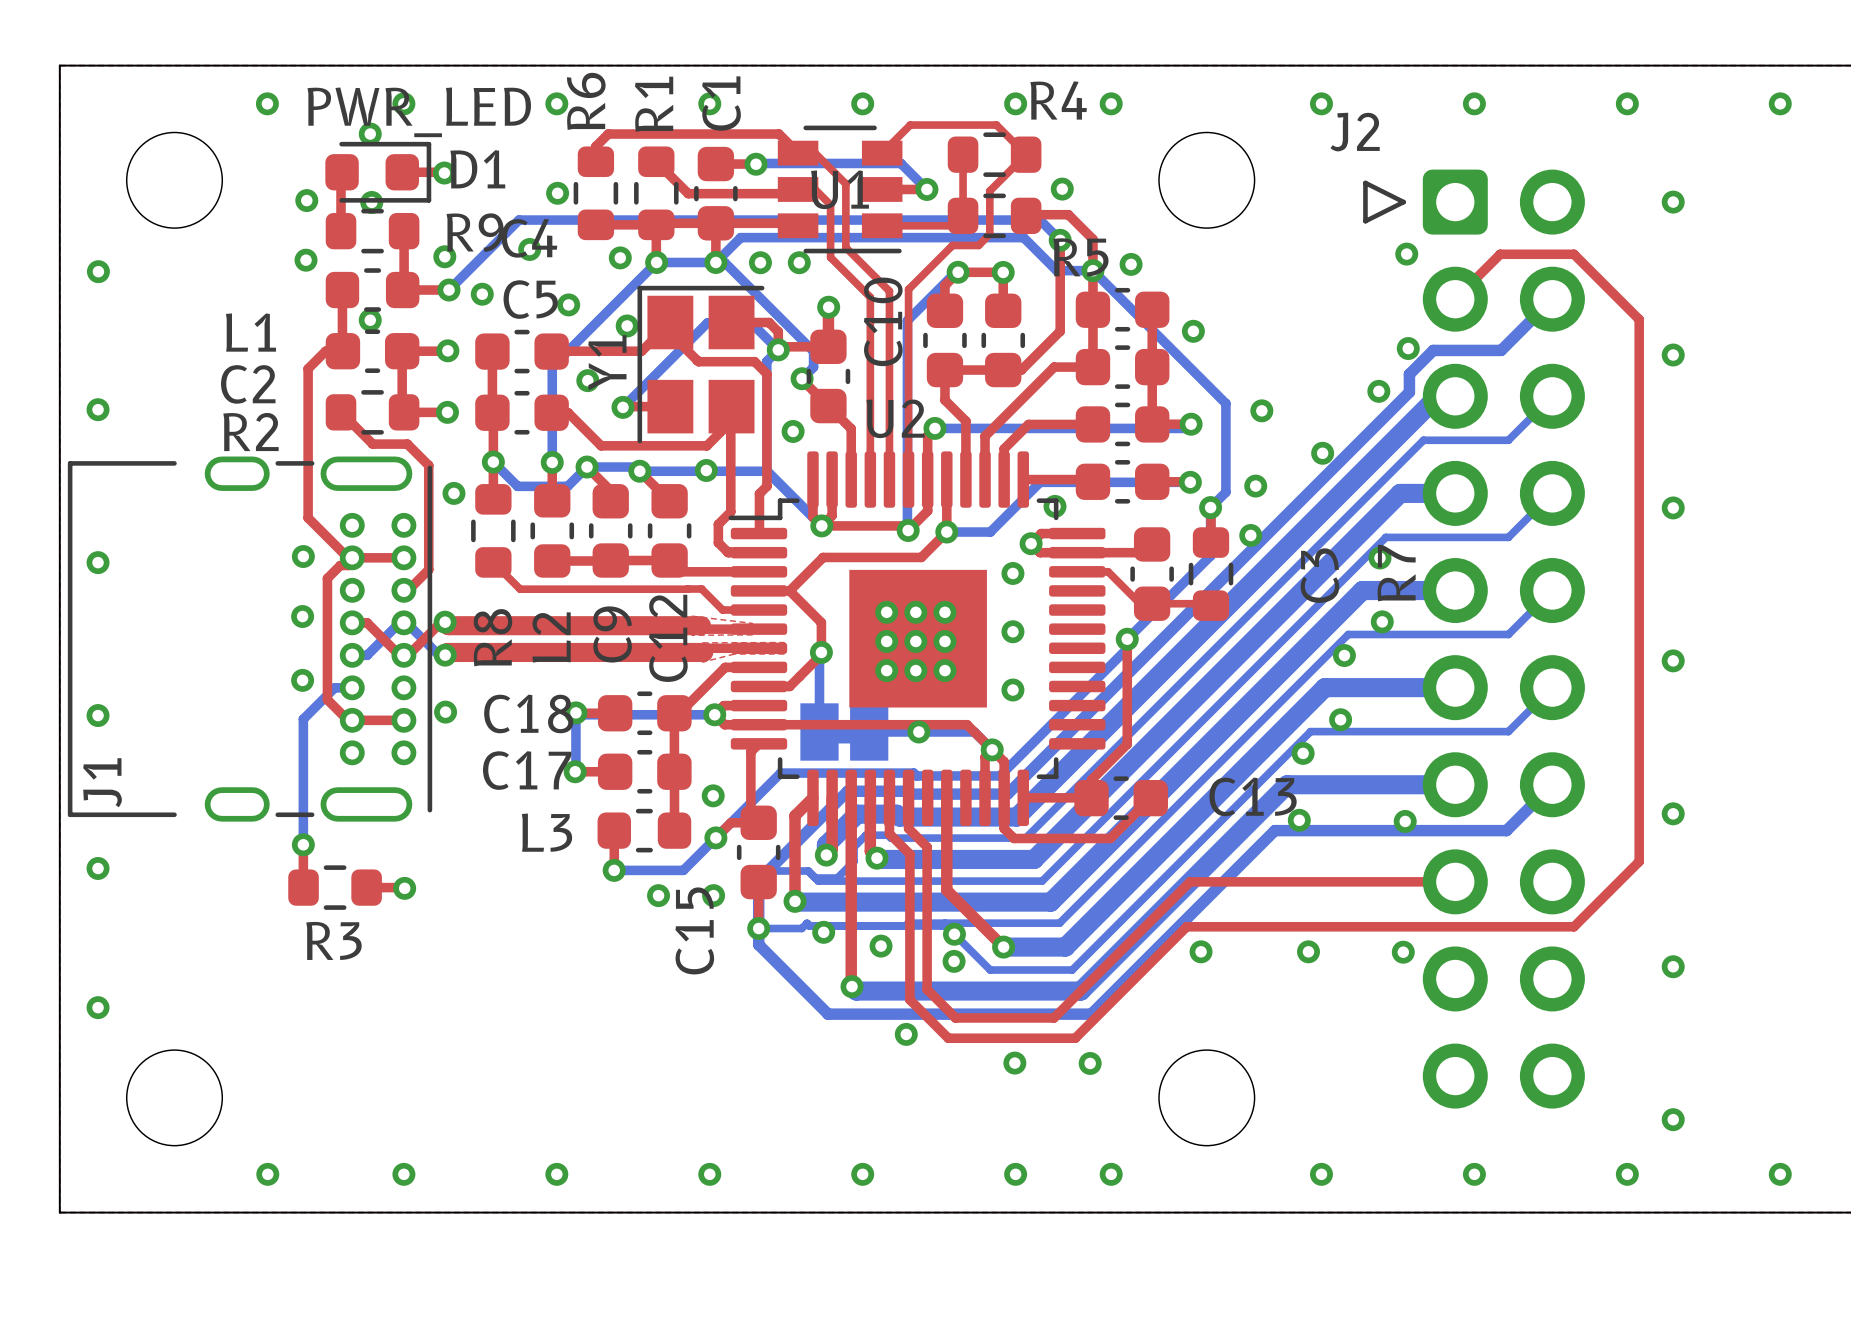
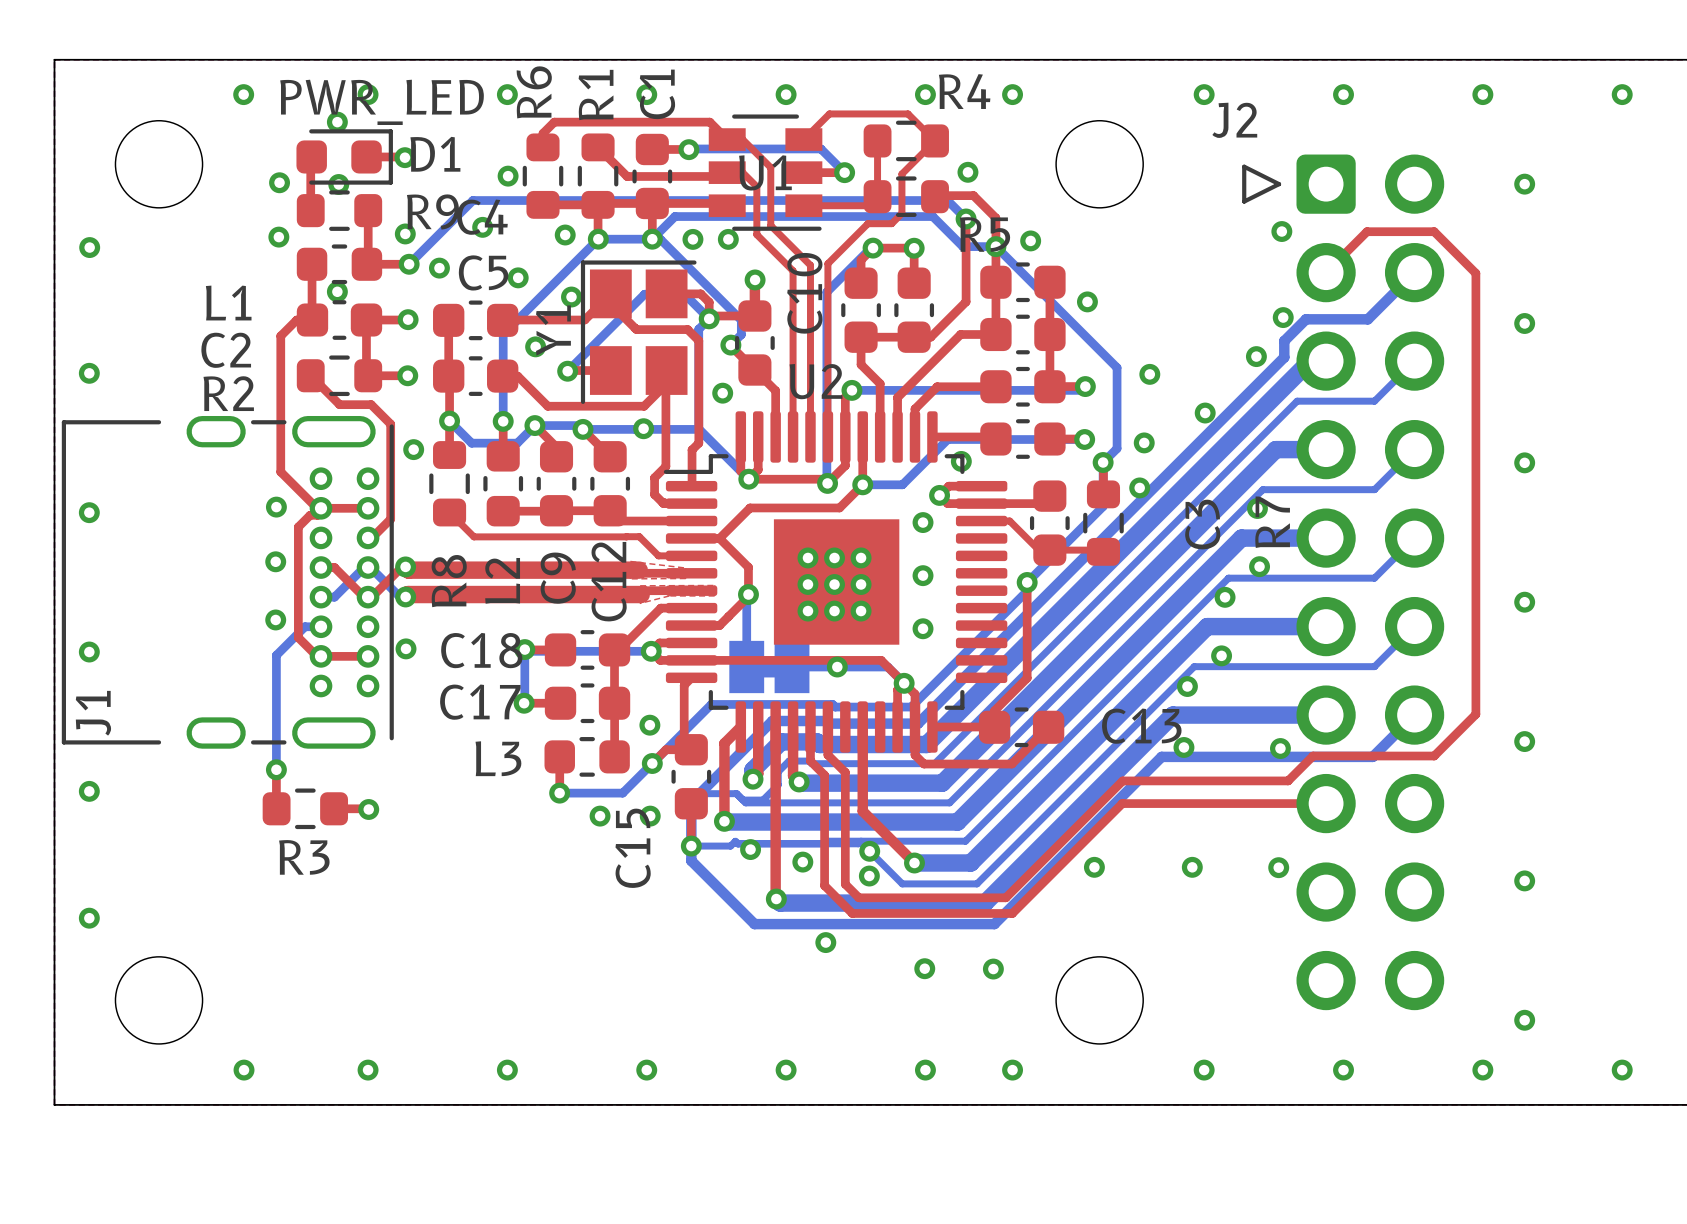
top track: (1619, 300) (1639, 319) (1639, 861) (1573, 926) (1186, 926) -> (1475, 273) (1475, 714) (1434, 756) (1313, 756) (1288, 780) (1122, 780) (1005, 897) (858, 897) (845, 884) (844, 771)
top track: (889, 833) (909, 854) (909, 999) (948, 1038) (1075, 1038) (1111, 1002) -> (810, 759) (824, 775) (824, 885) (852, 913) (1012, 913)
top track: (927, 847) (927, 989) (955, 1017) (1054, 1017) (1190, 881) (1231, 881) -> (1081, 844) (1122, 803)

